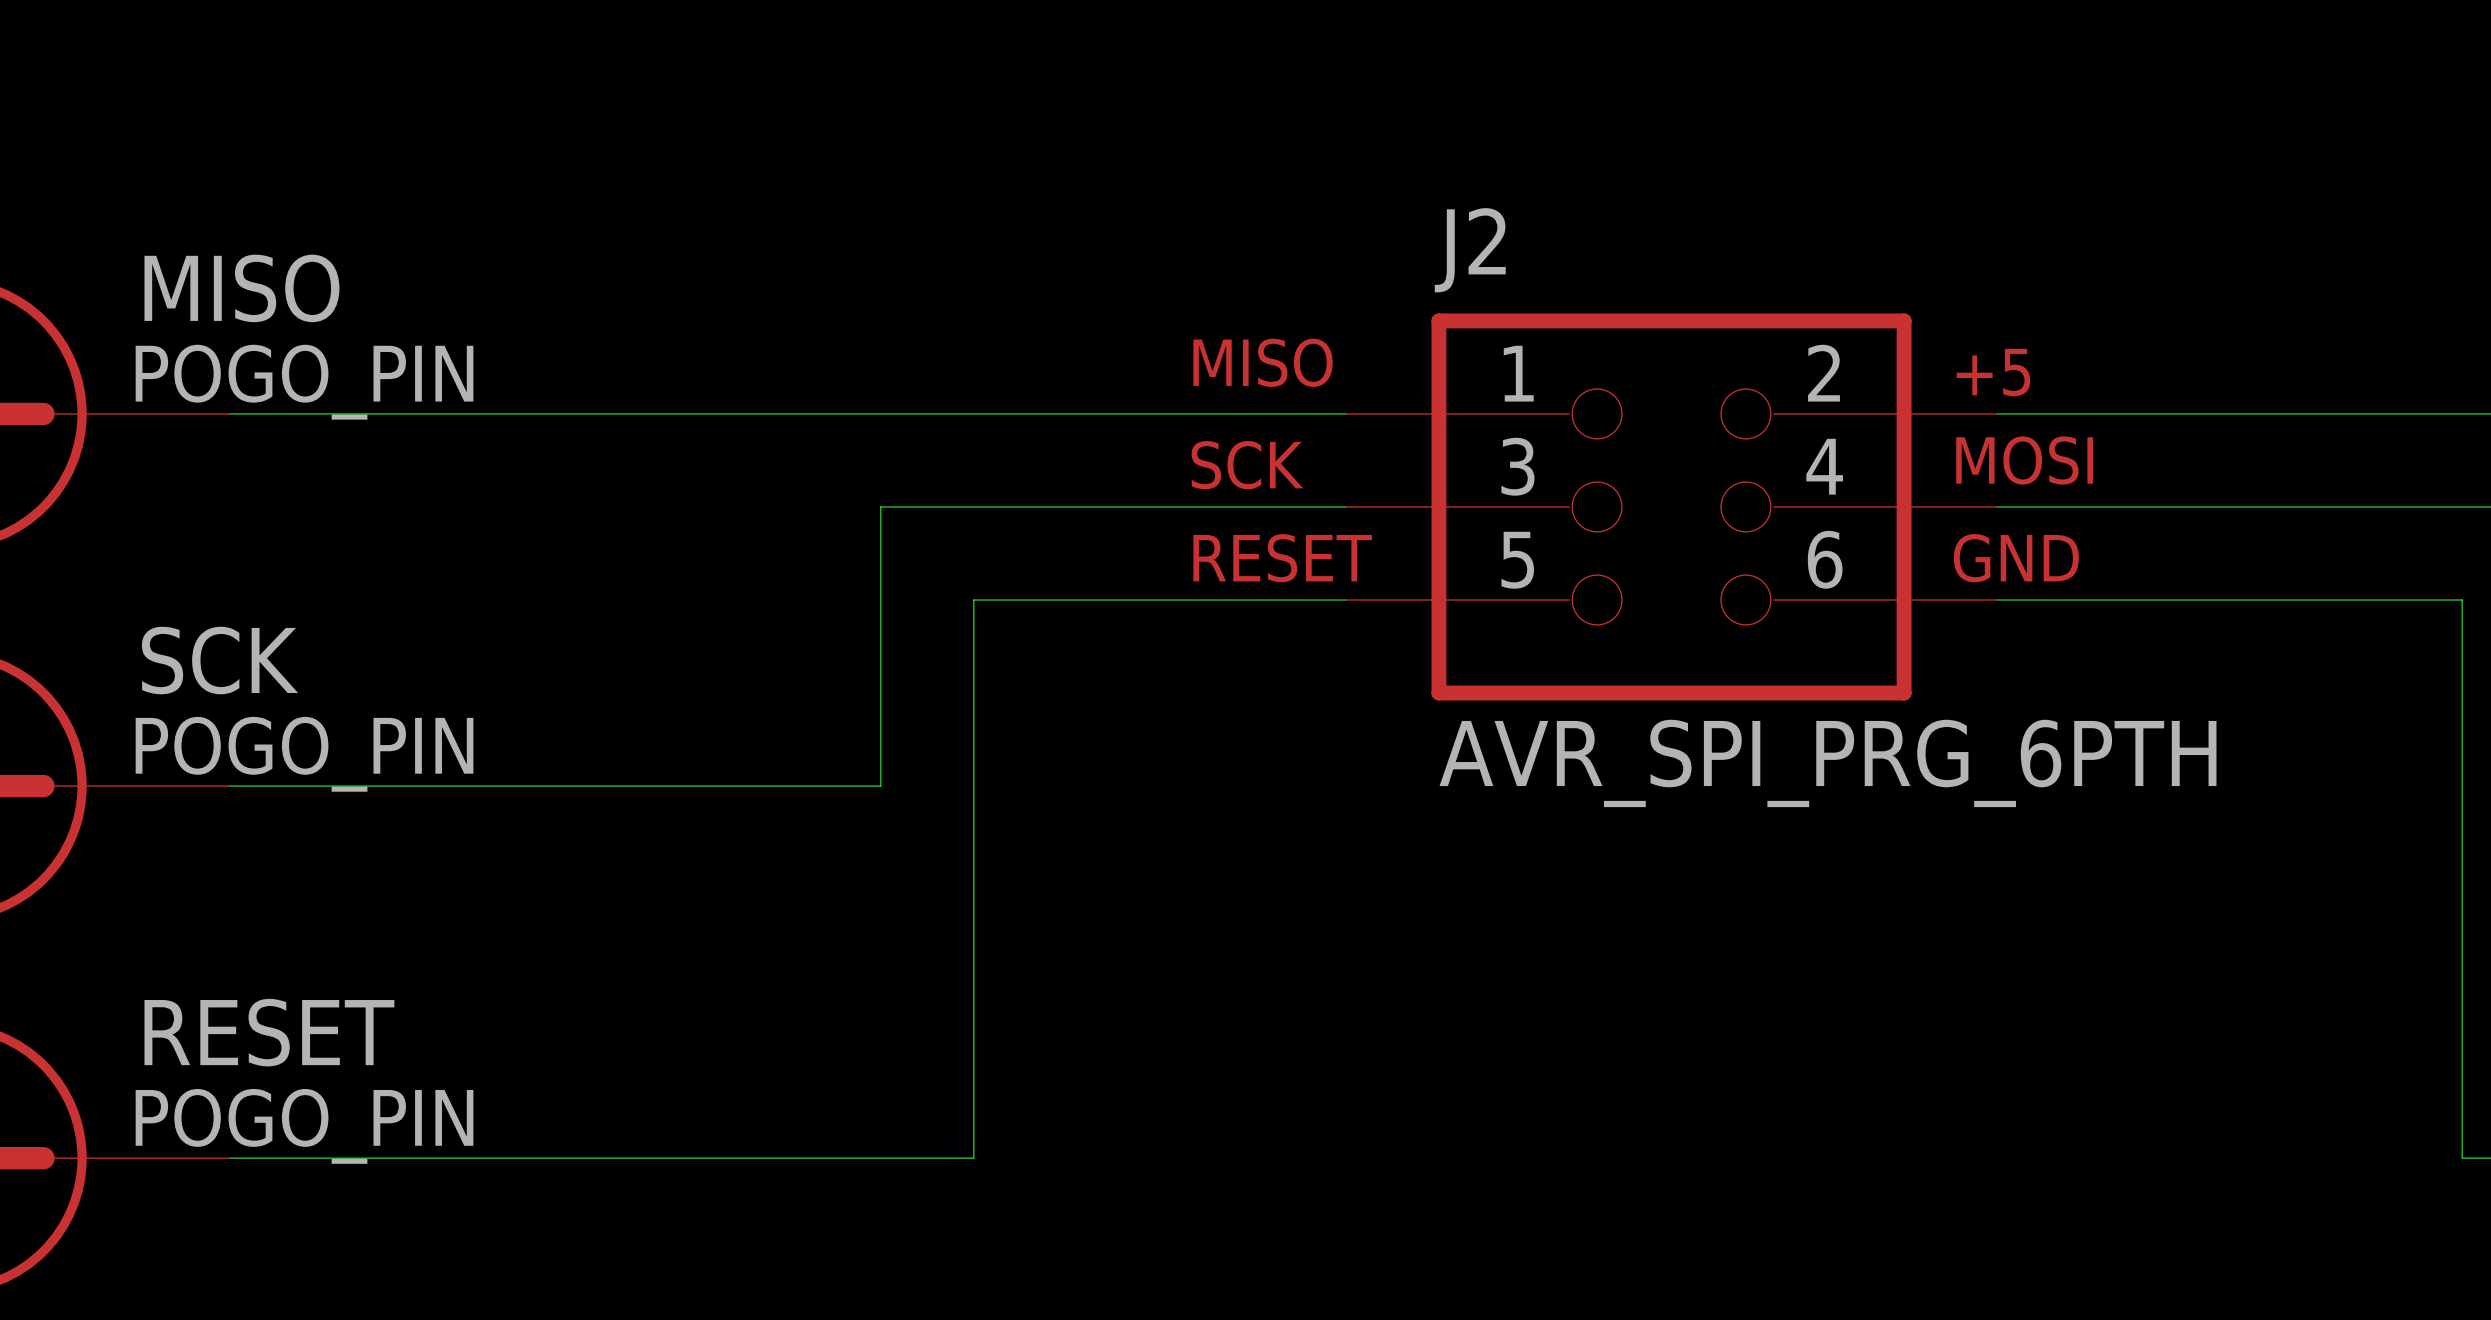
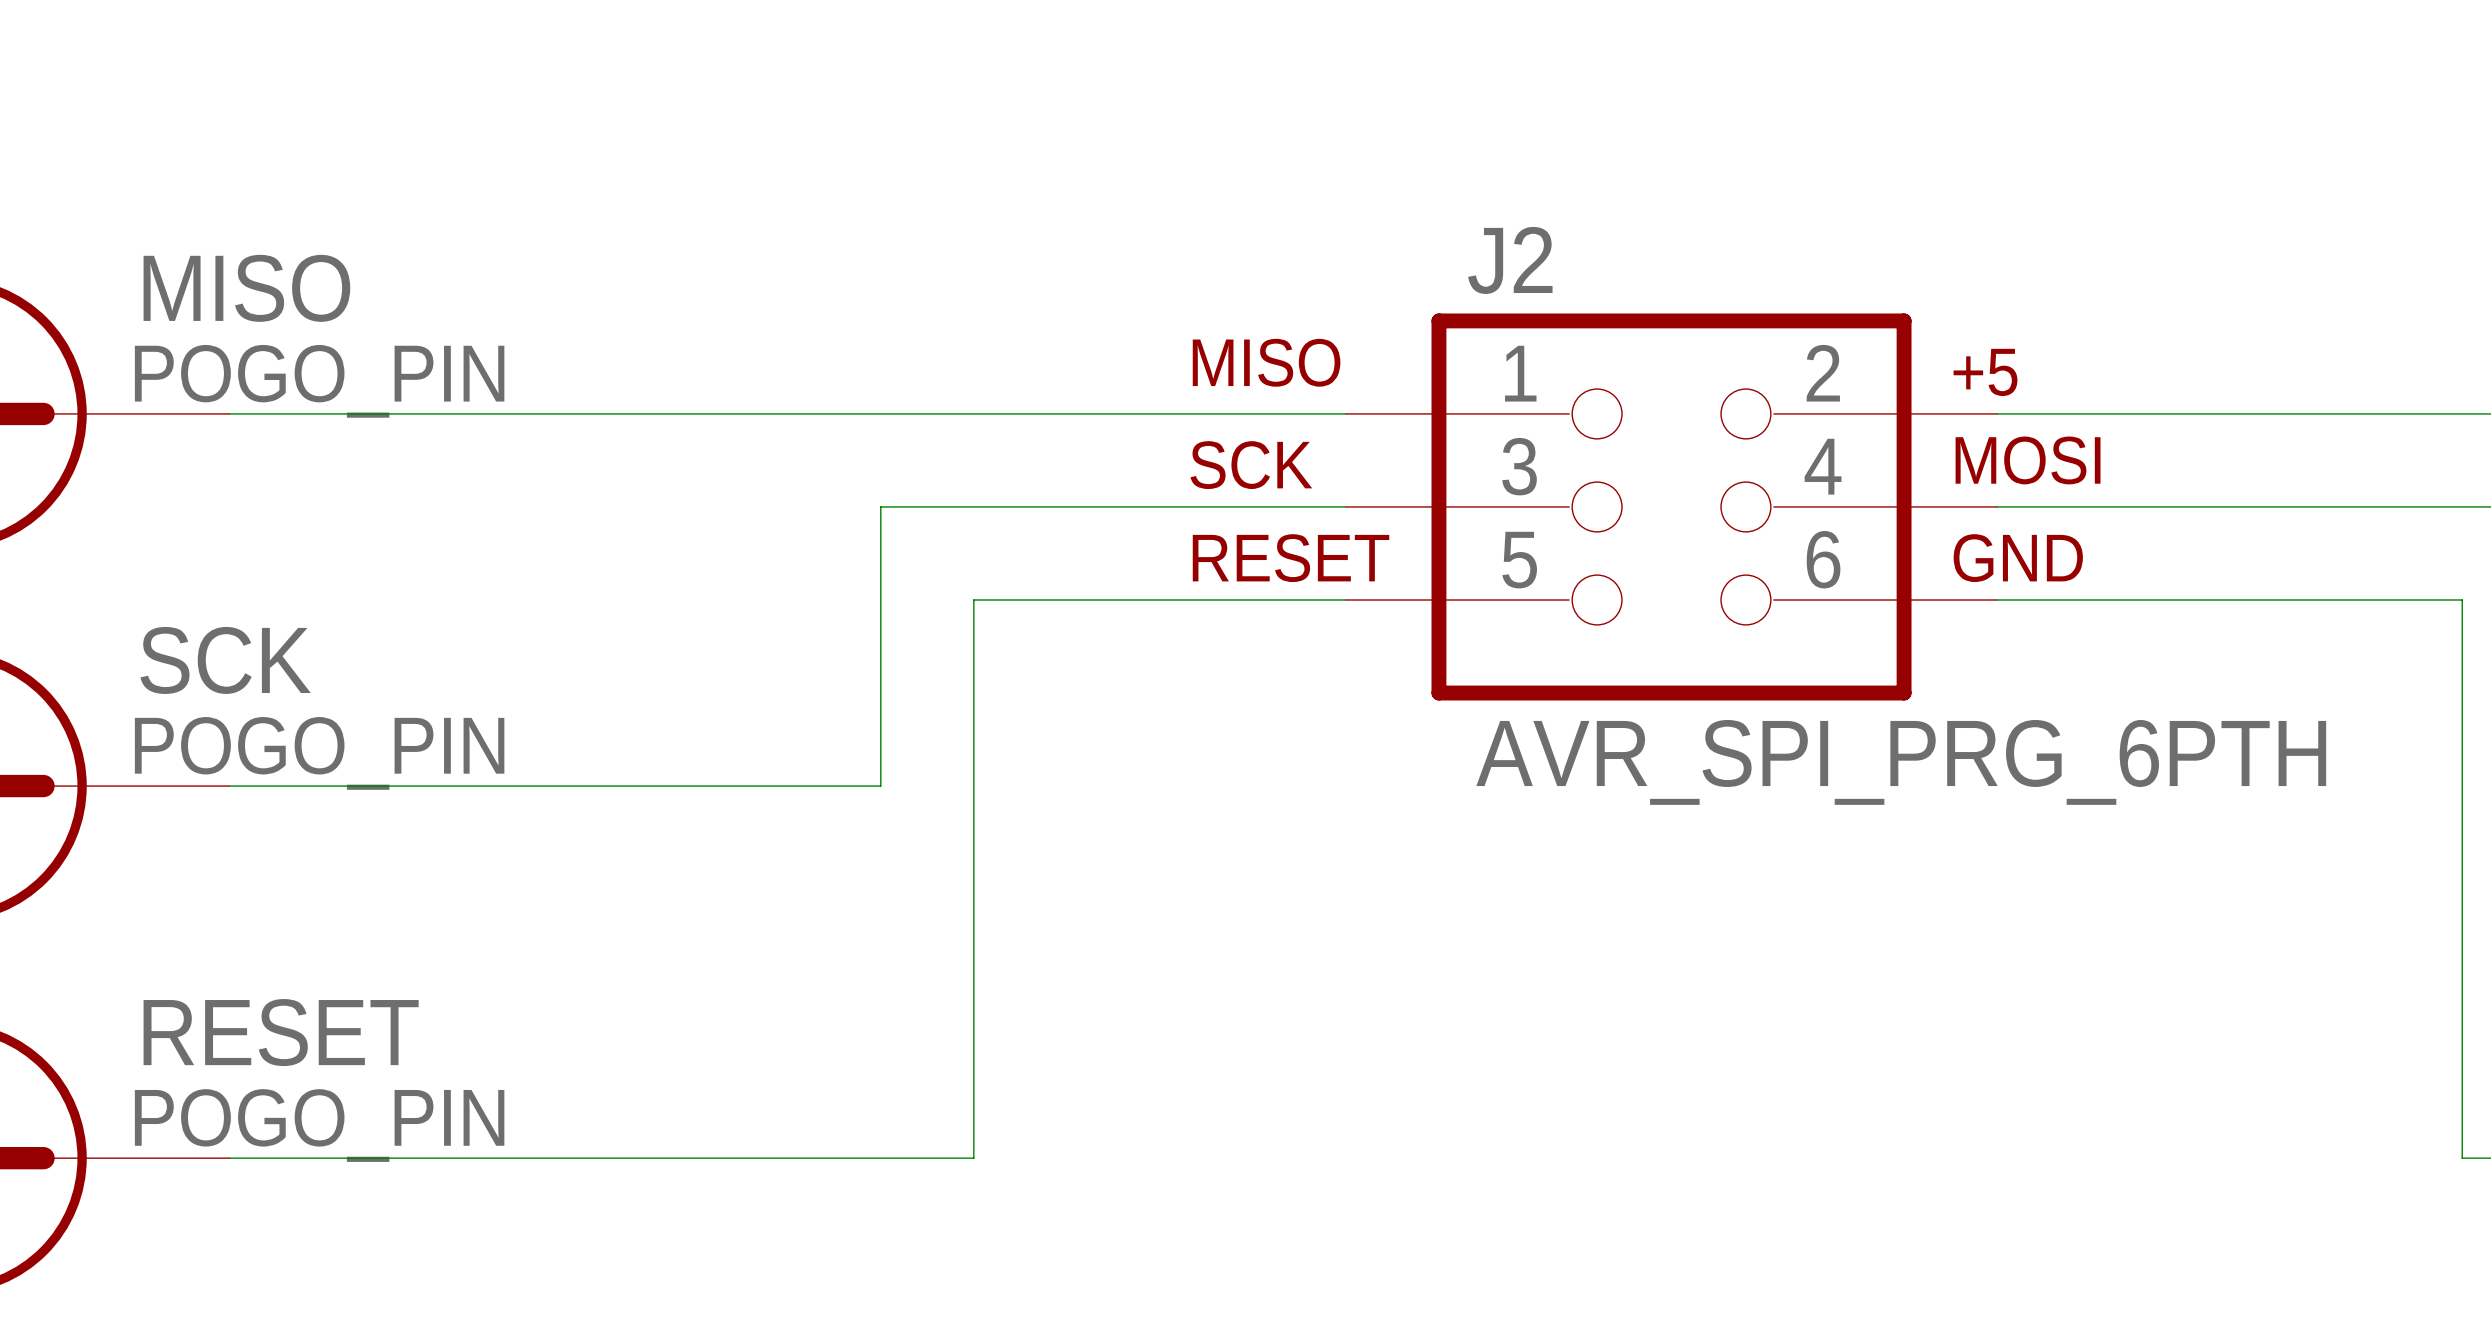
J2 name position: J2 (1470, 250) -> J2 (1510, 260)
J2 value position: AVR_SPI_PRG_6PTH (1828, 763) -> AVR_SPI_PRG_6PTH (1901, 762)

